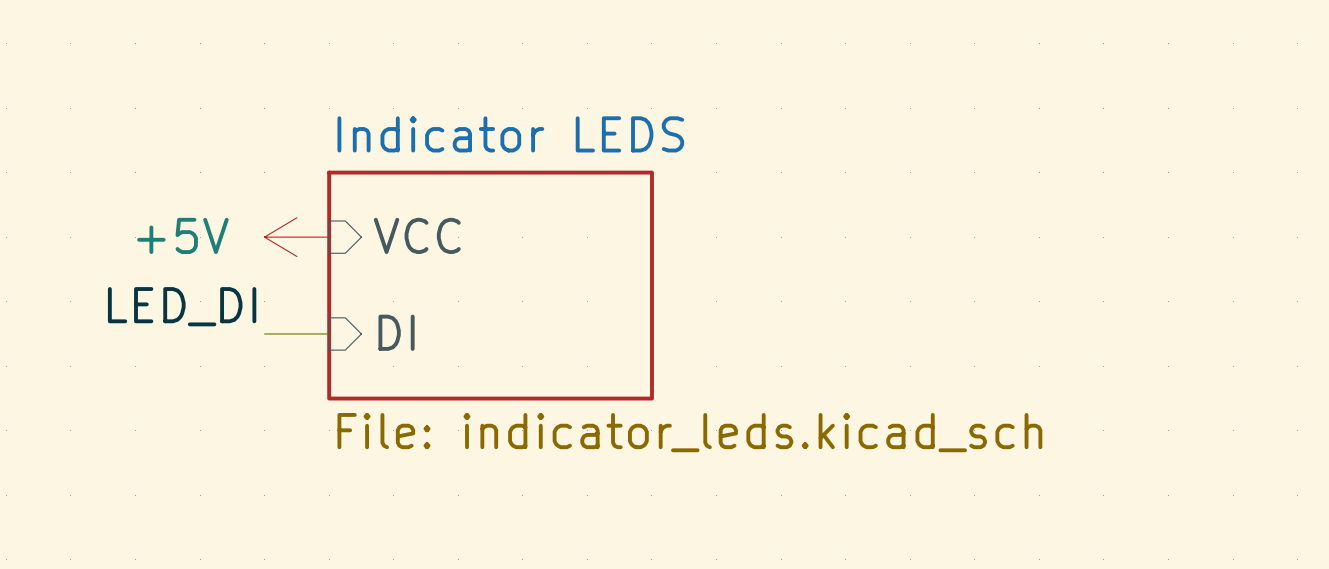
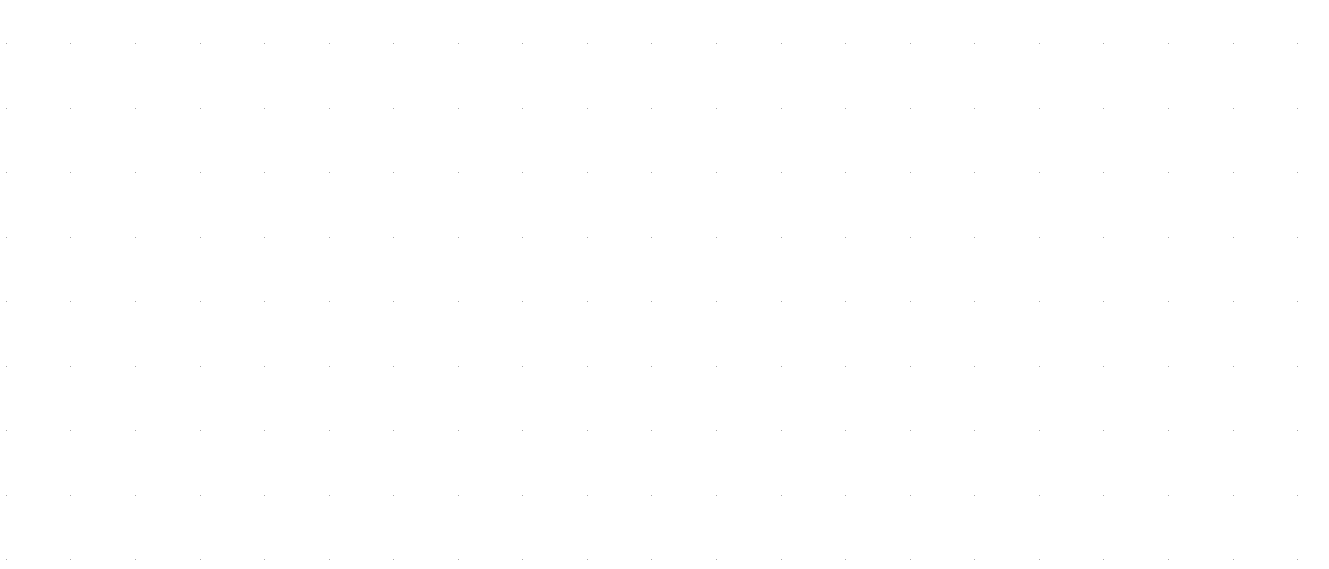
sheet pin: VCC (417, 235) -> none
power symbol: +5V (296, 237) -> none
sheet Indicator LEDS: File: indicator_leds.kicad_sch (490, 285) -> none
label: LED_DI (182, 306) -> none
sheet pin: DI (396, 332) -> none
wire: (264, 333) (329, 333) -> none

